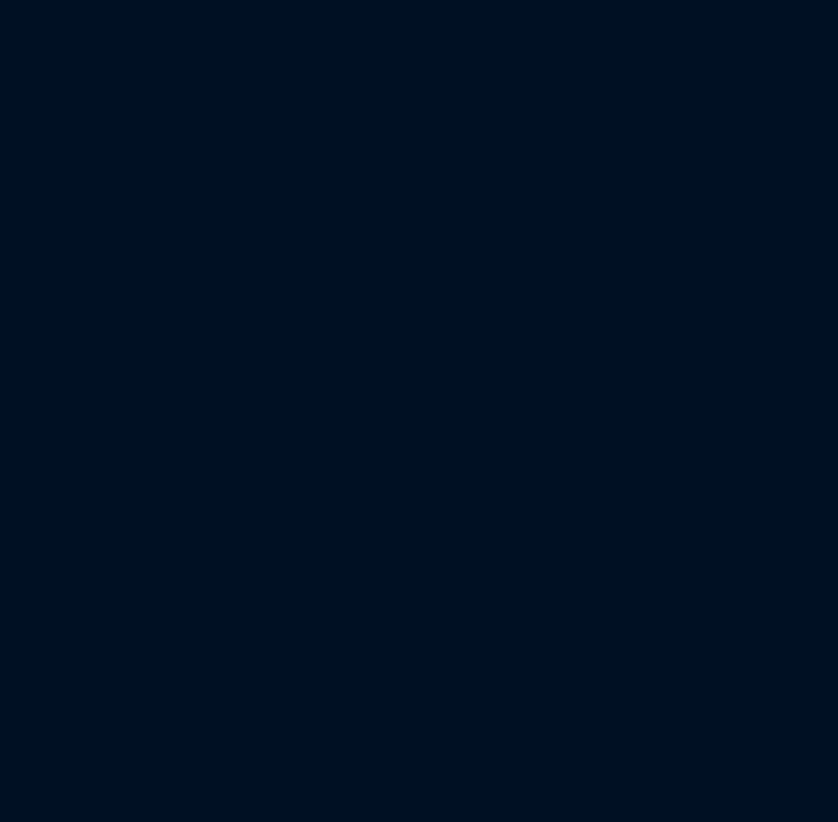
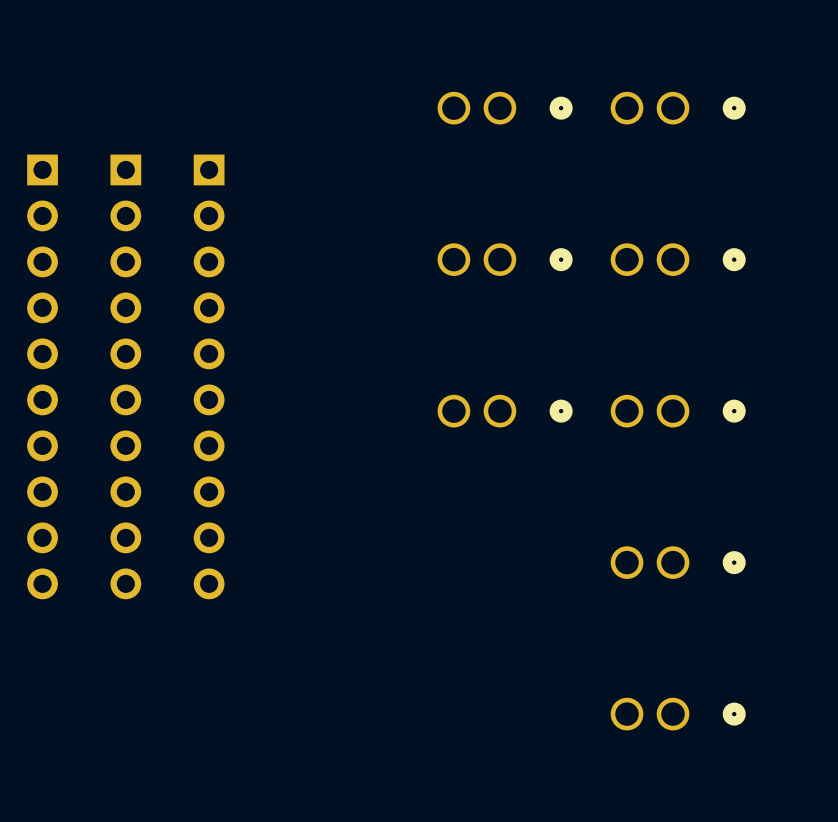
part: none -> (505, 108)
part: none -> (678, 108)
part: none -> (505, 259)
part: none -> (678, 259)
part: none -> (42, 376)
part: none -> (125, 376)
part: none -> (209, 376)
part: none -> (505, 411)
part: none -> (678, 411)
part: none -> (678, 562)
part: none -> (678, 714)

